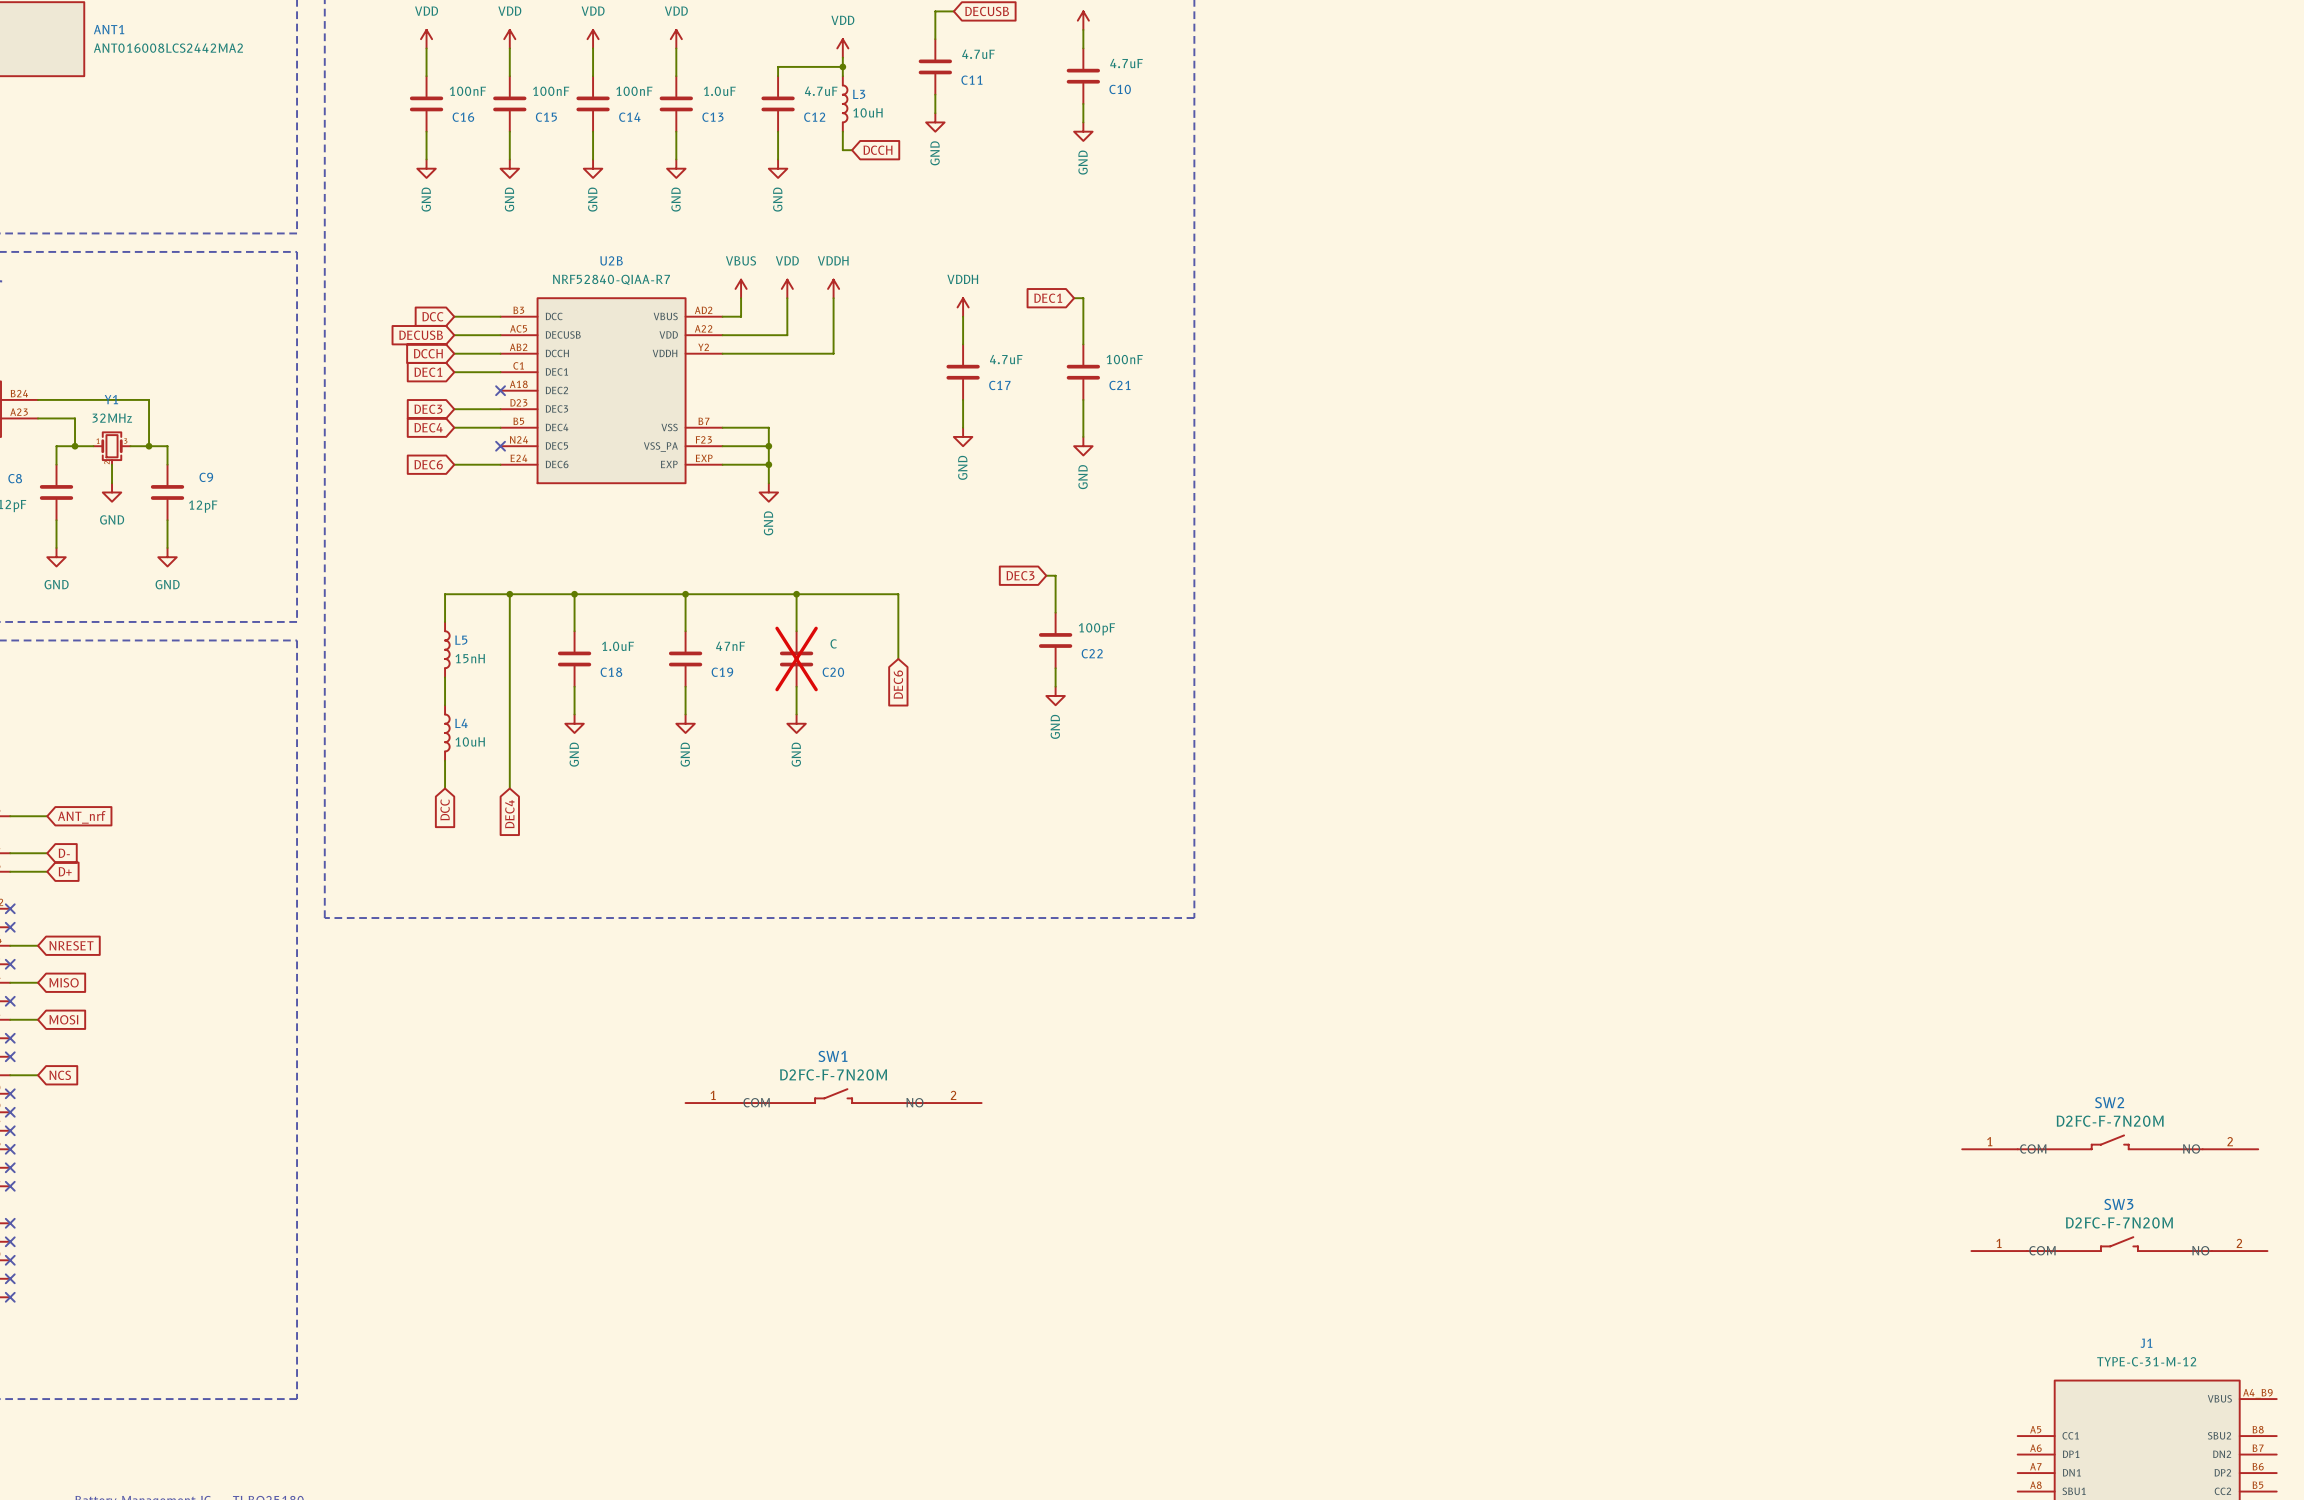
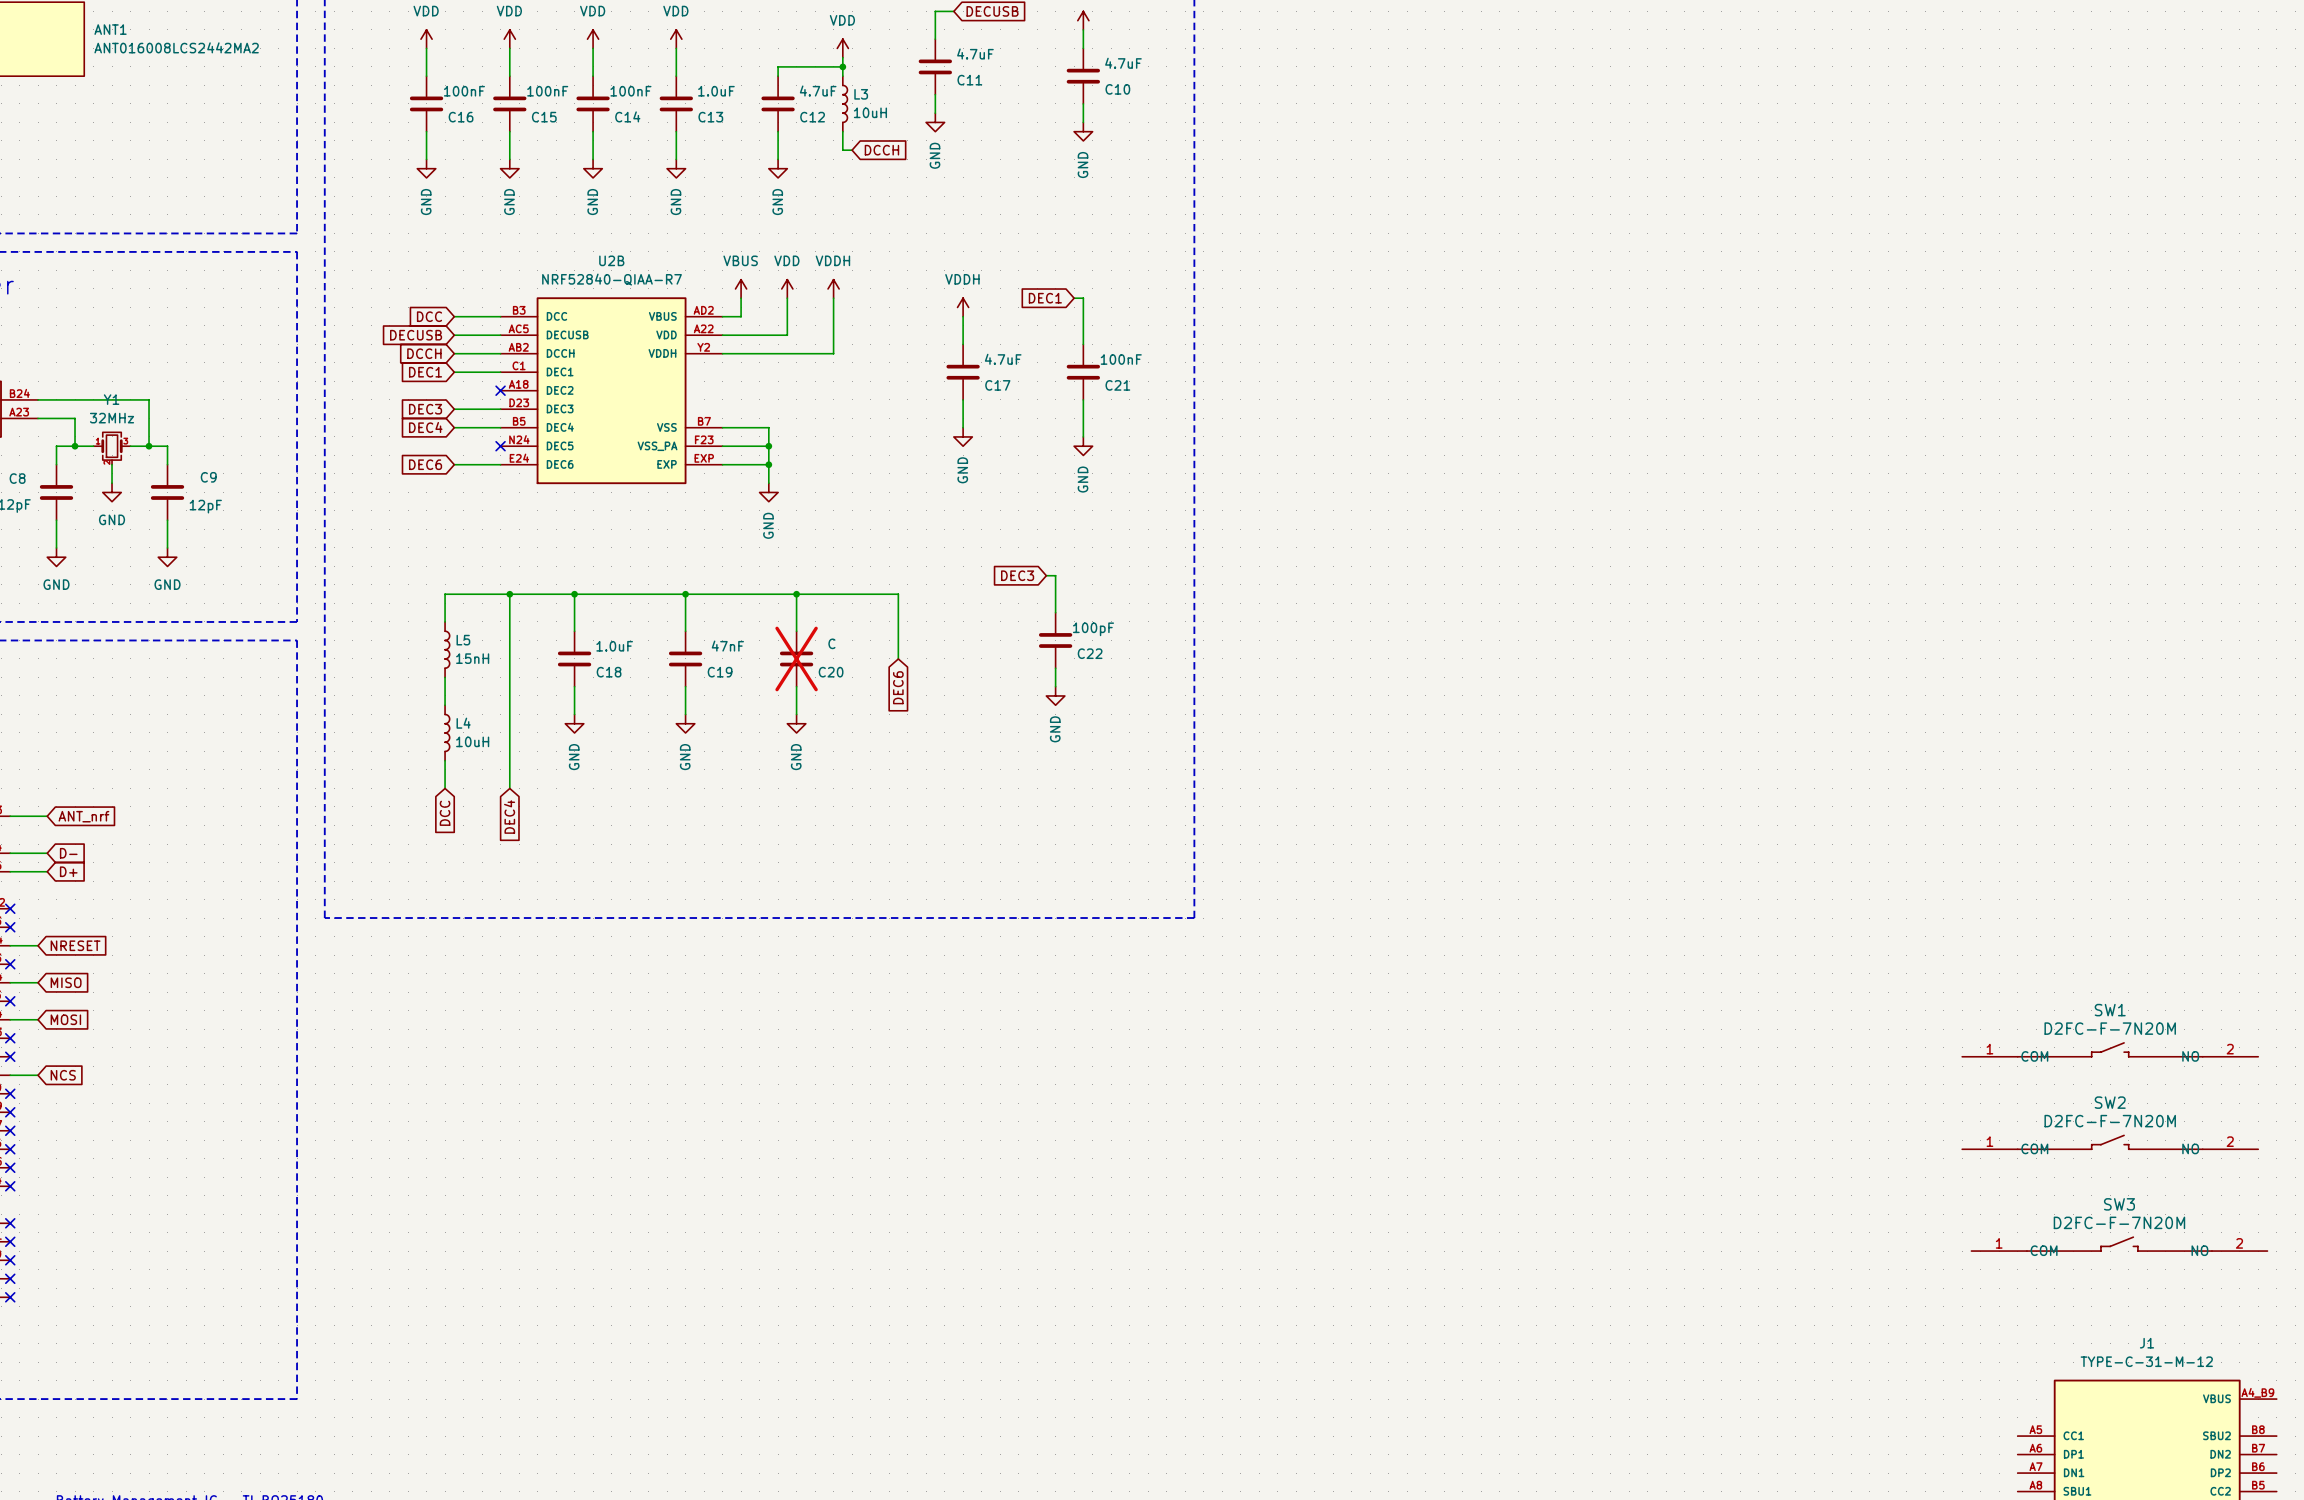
SW1 position: (833, 1096) -> (2110, 1049)

